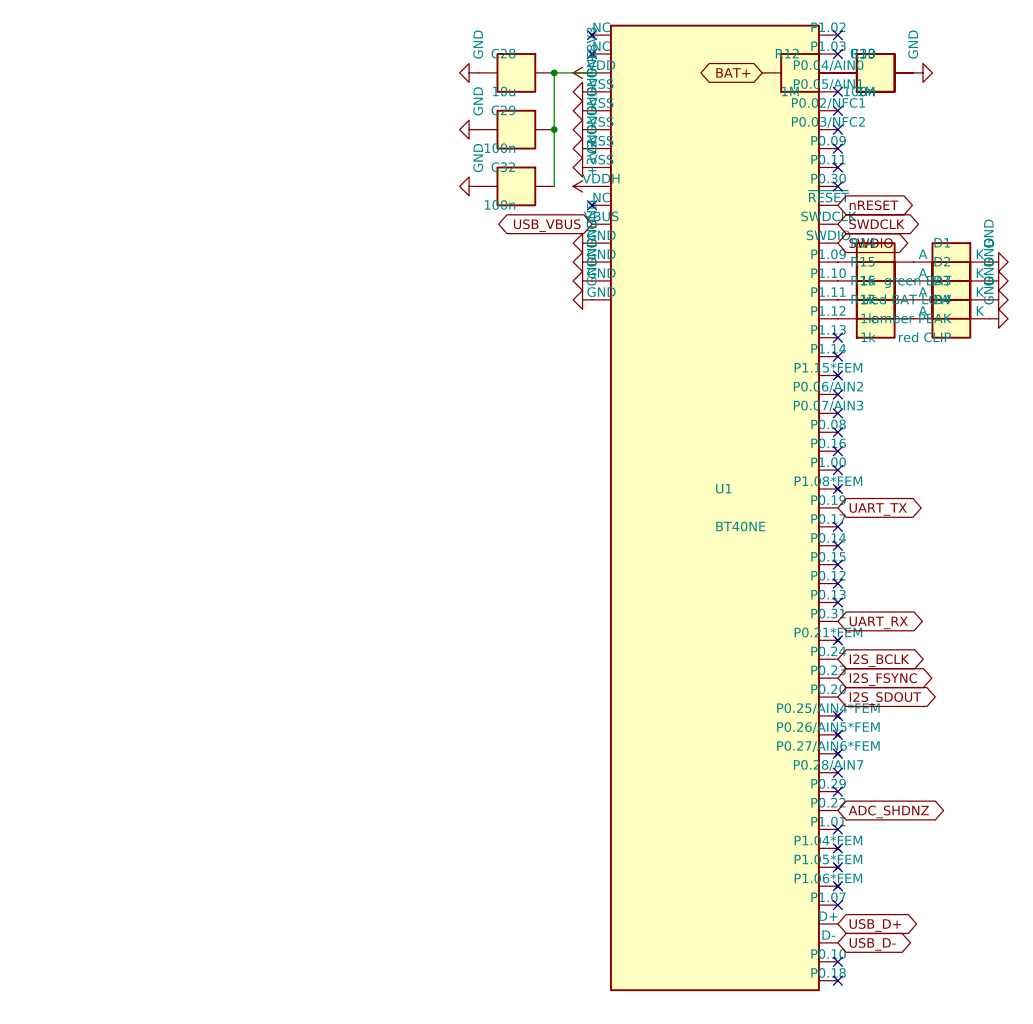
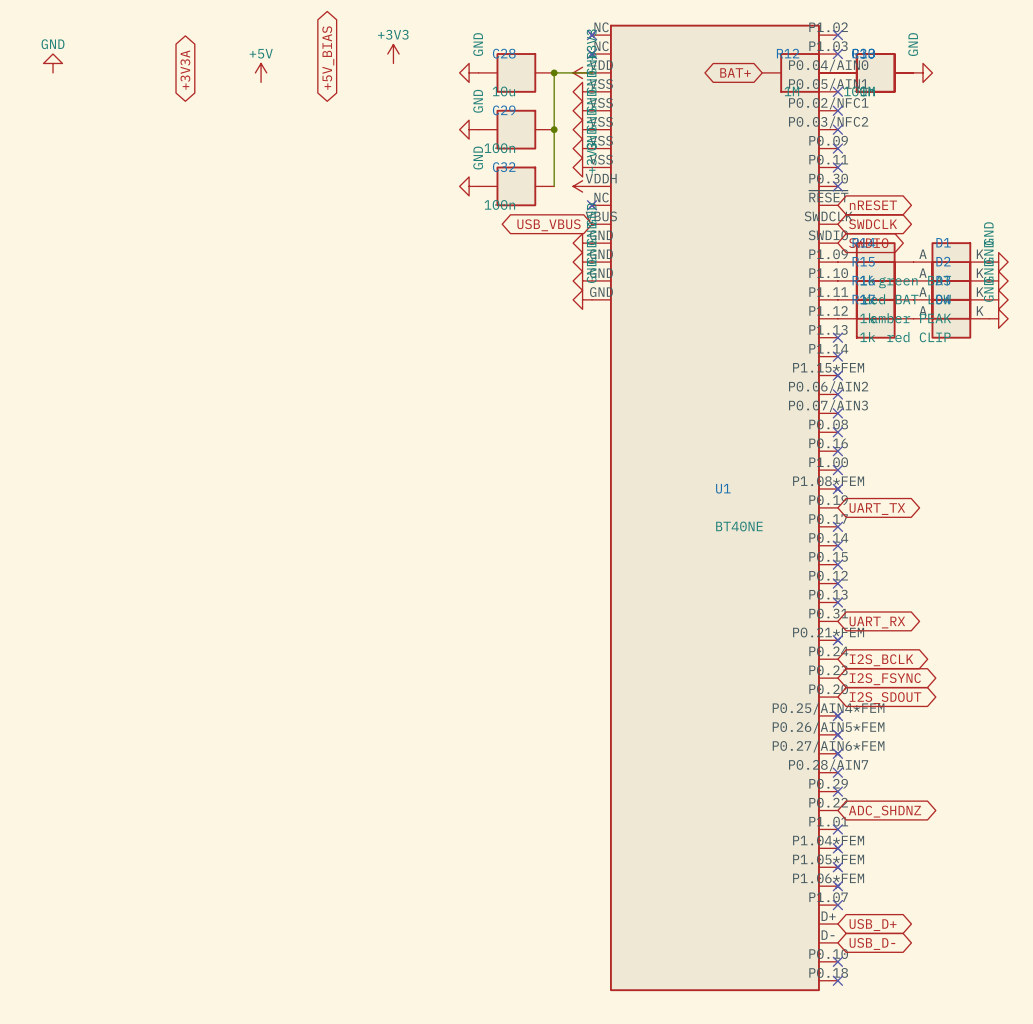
power symbol: none -> +3V3 (393, 54)
global label: none -> +5V_BIAS (328, 58)
power symbol: none -> GND (53, 63)
global label: none -> +3V3A (185, 70)
power symbol: none -> +5V (261, 72)

